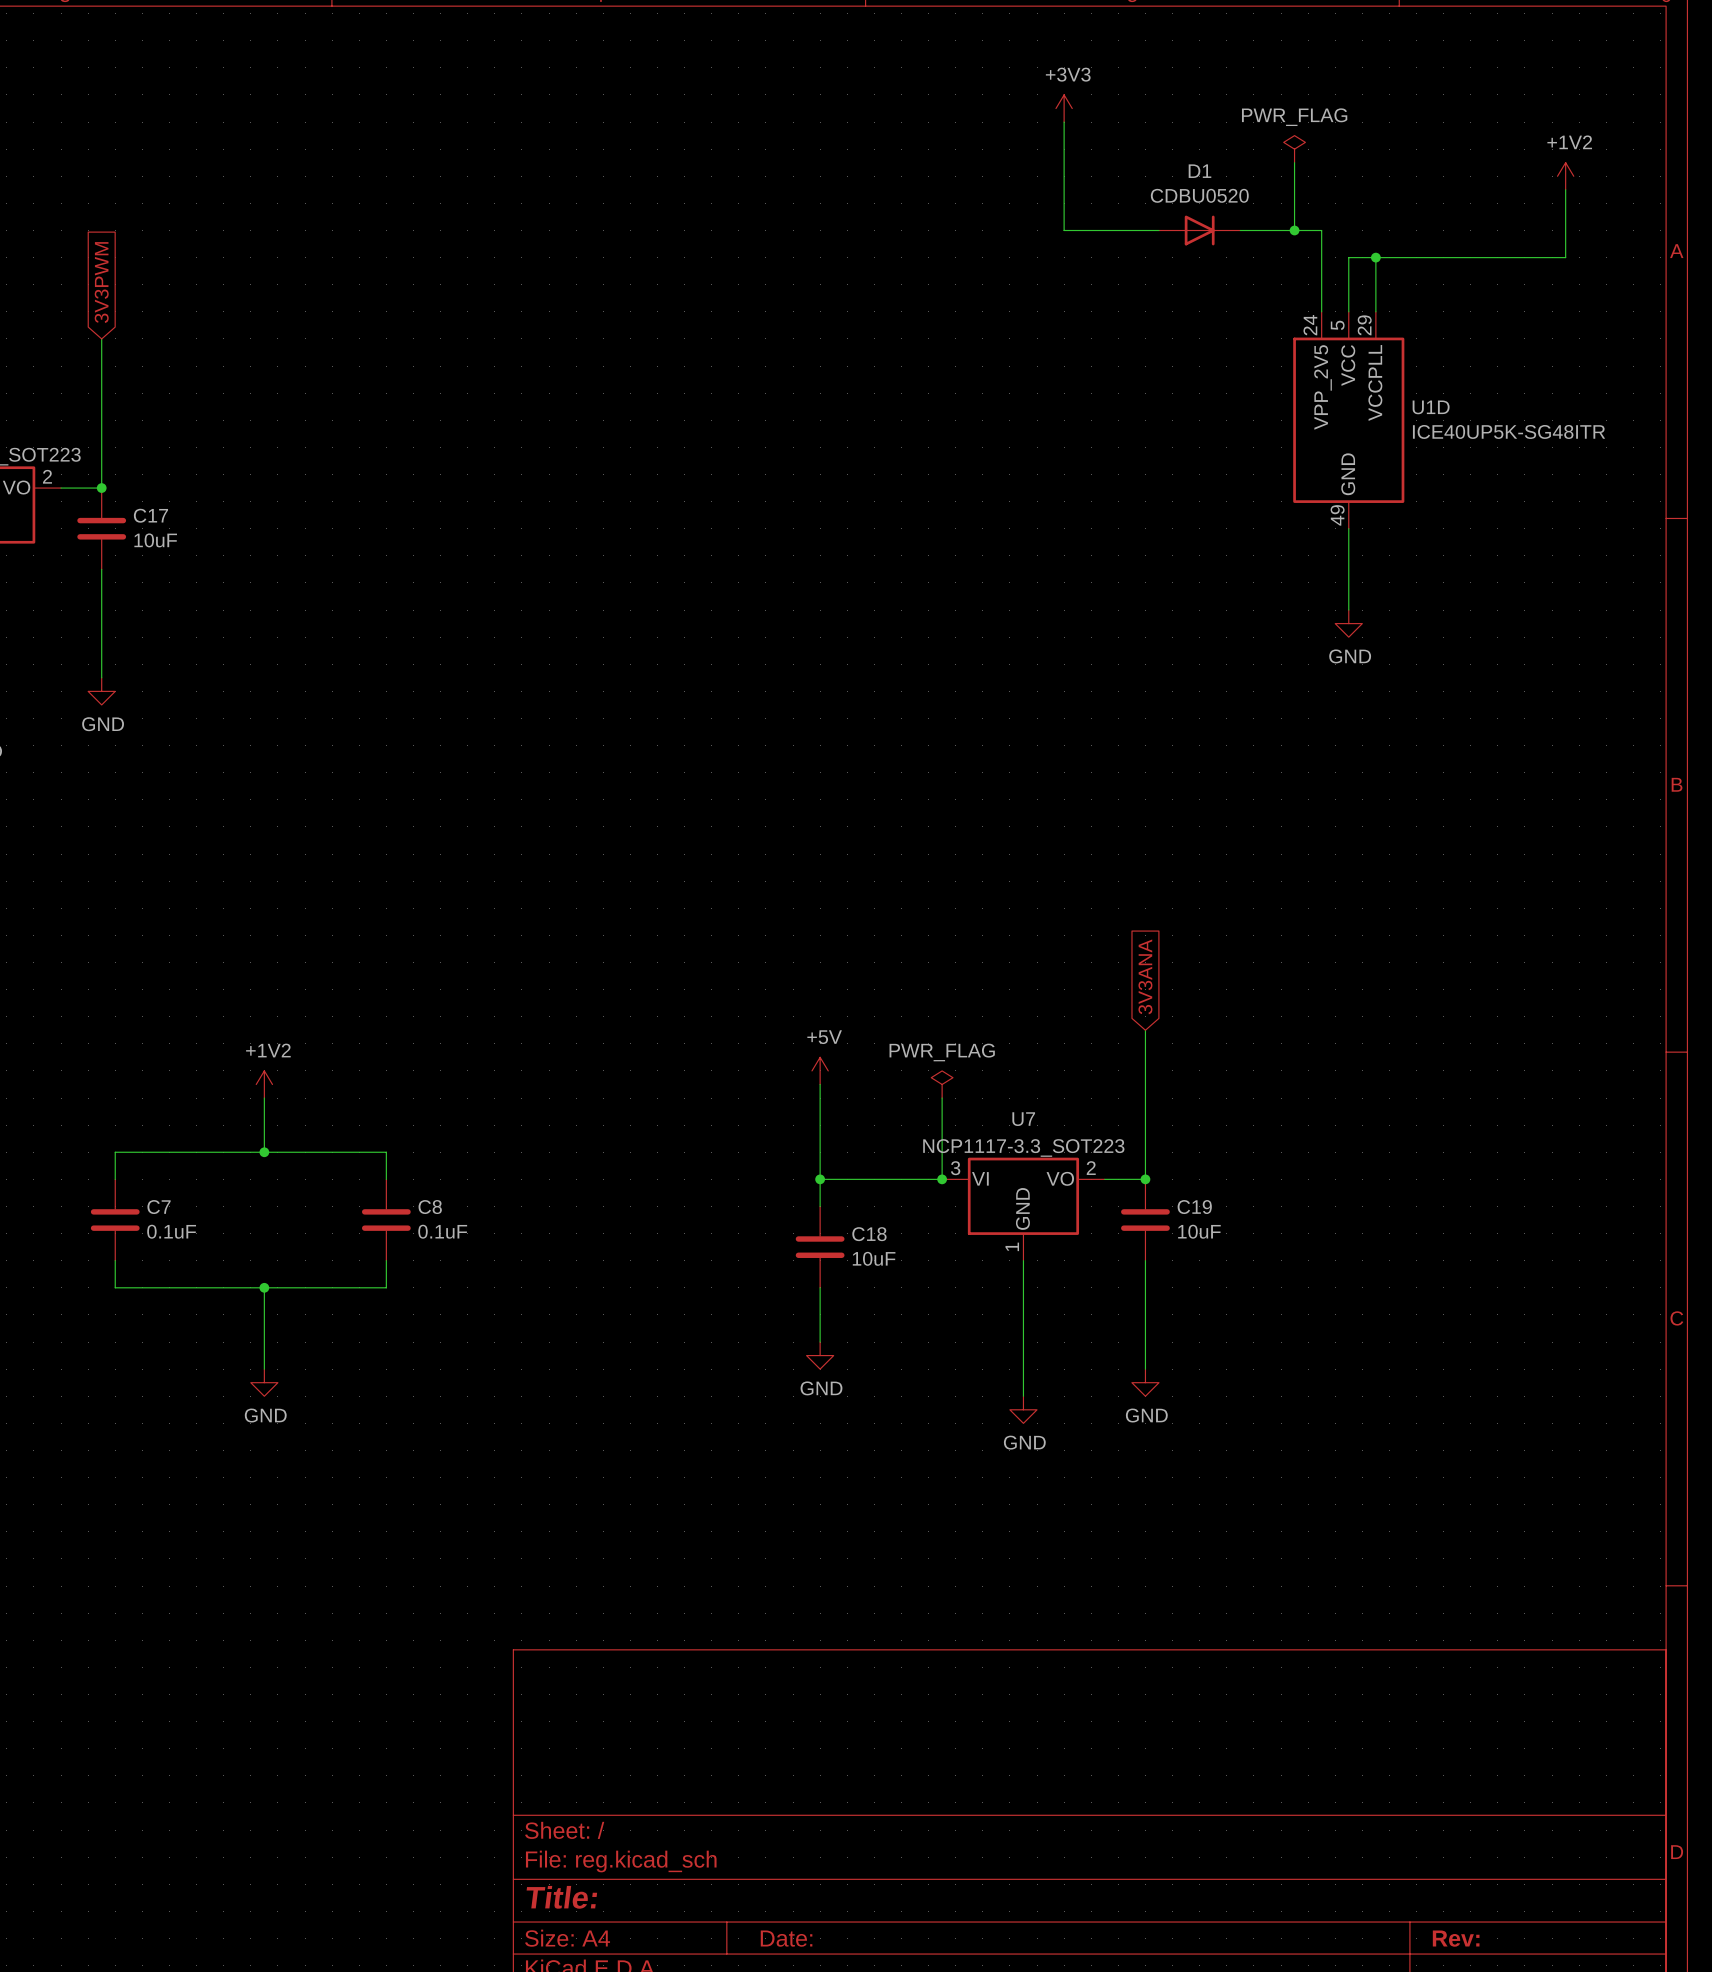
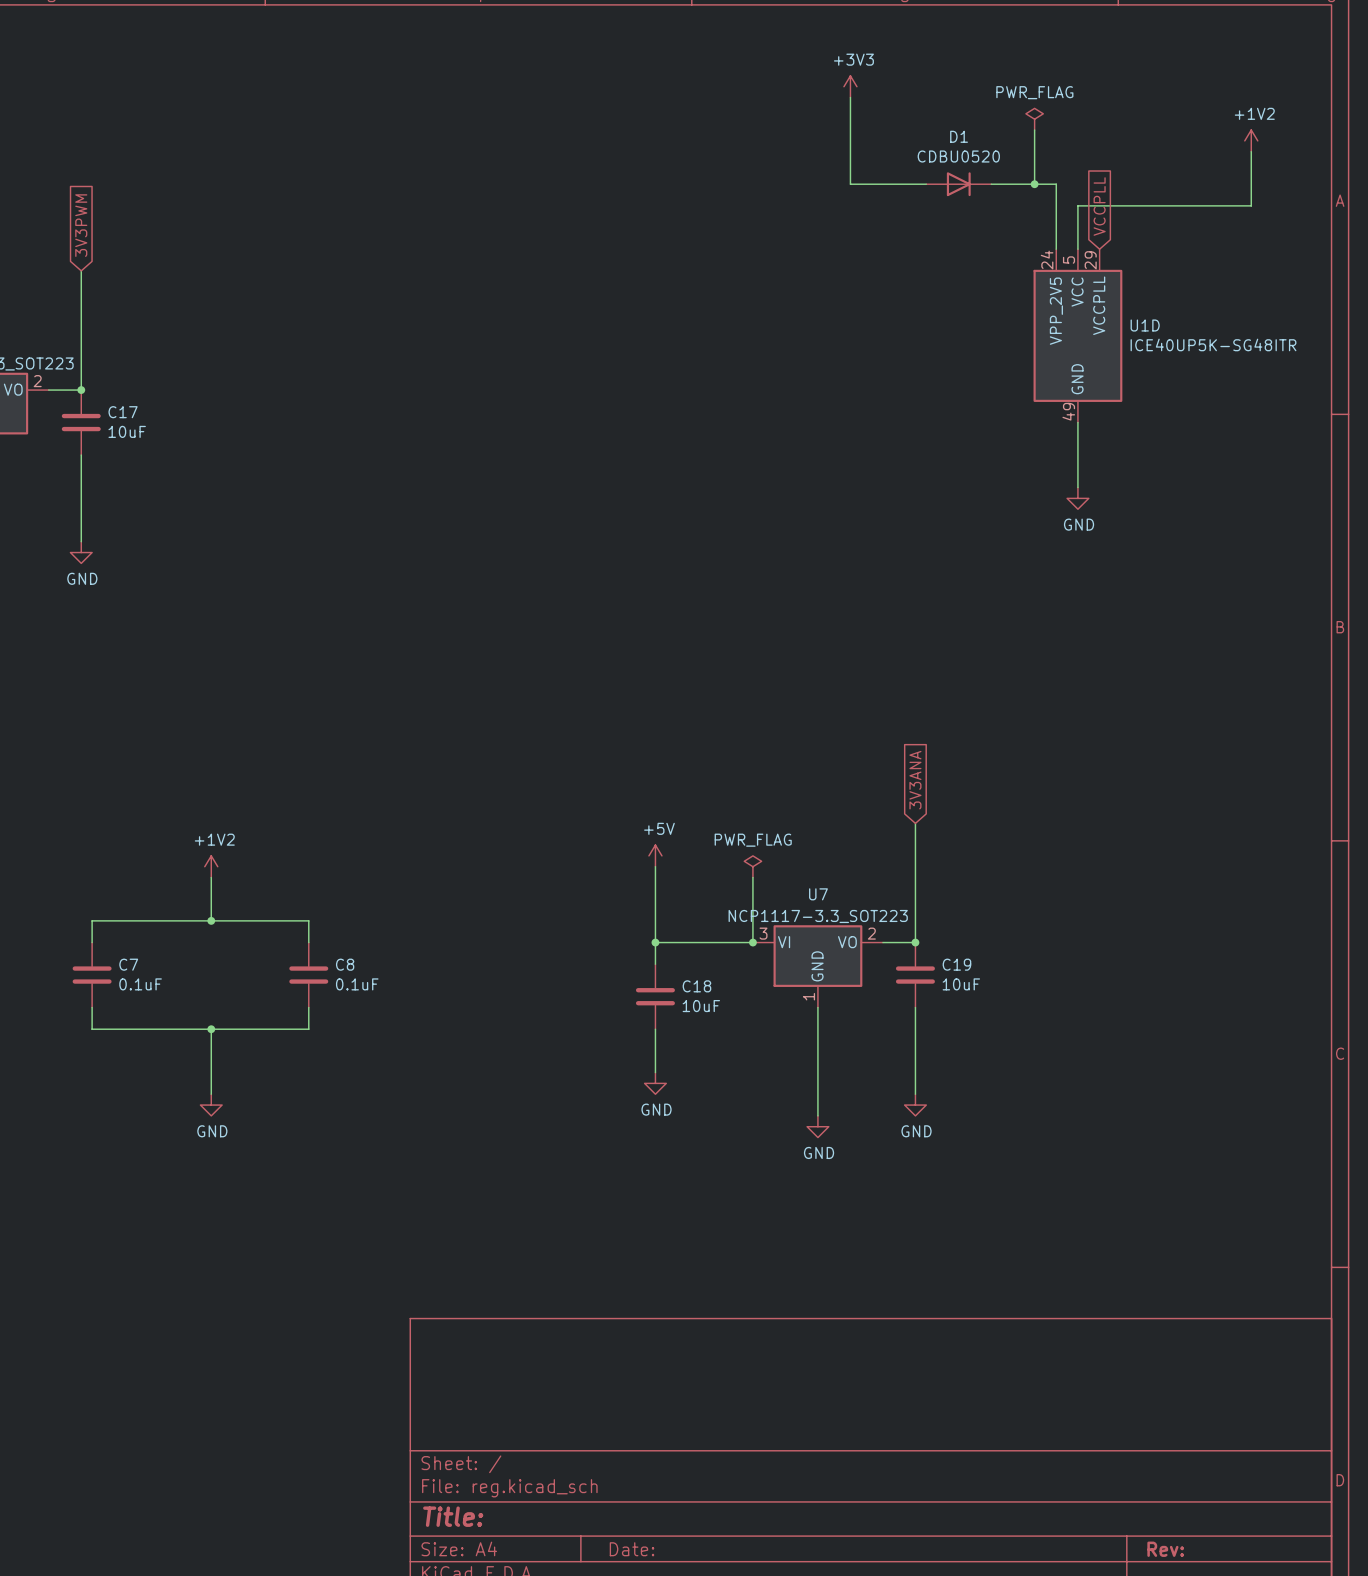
wire: (1375, 257) (1375, 311) -> none
junction: (1375, 257) -> none
global label: none -> VCCPLL (1099, 206)

